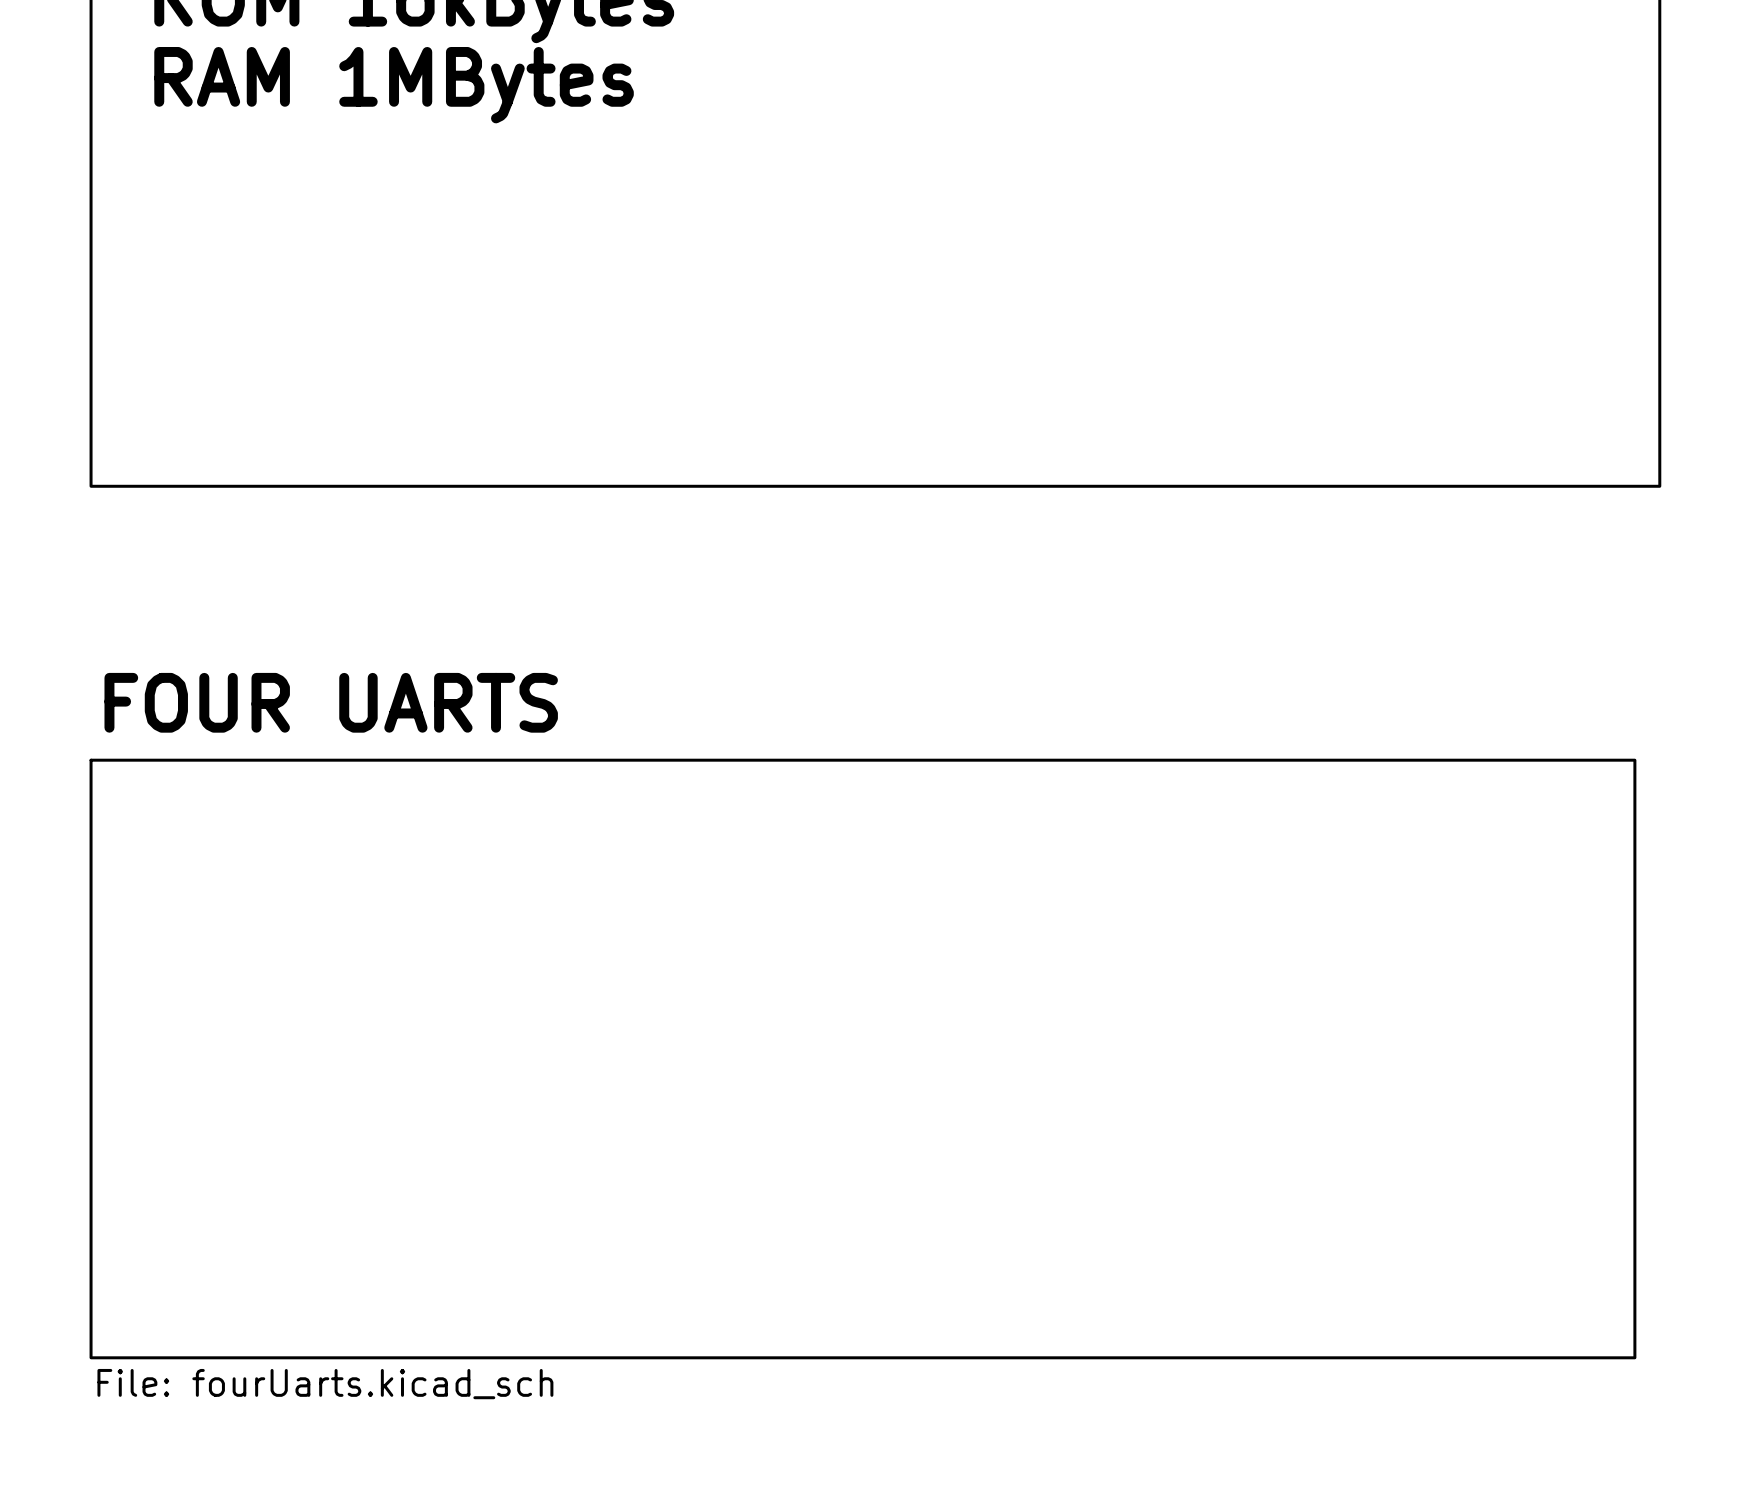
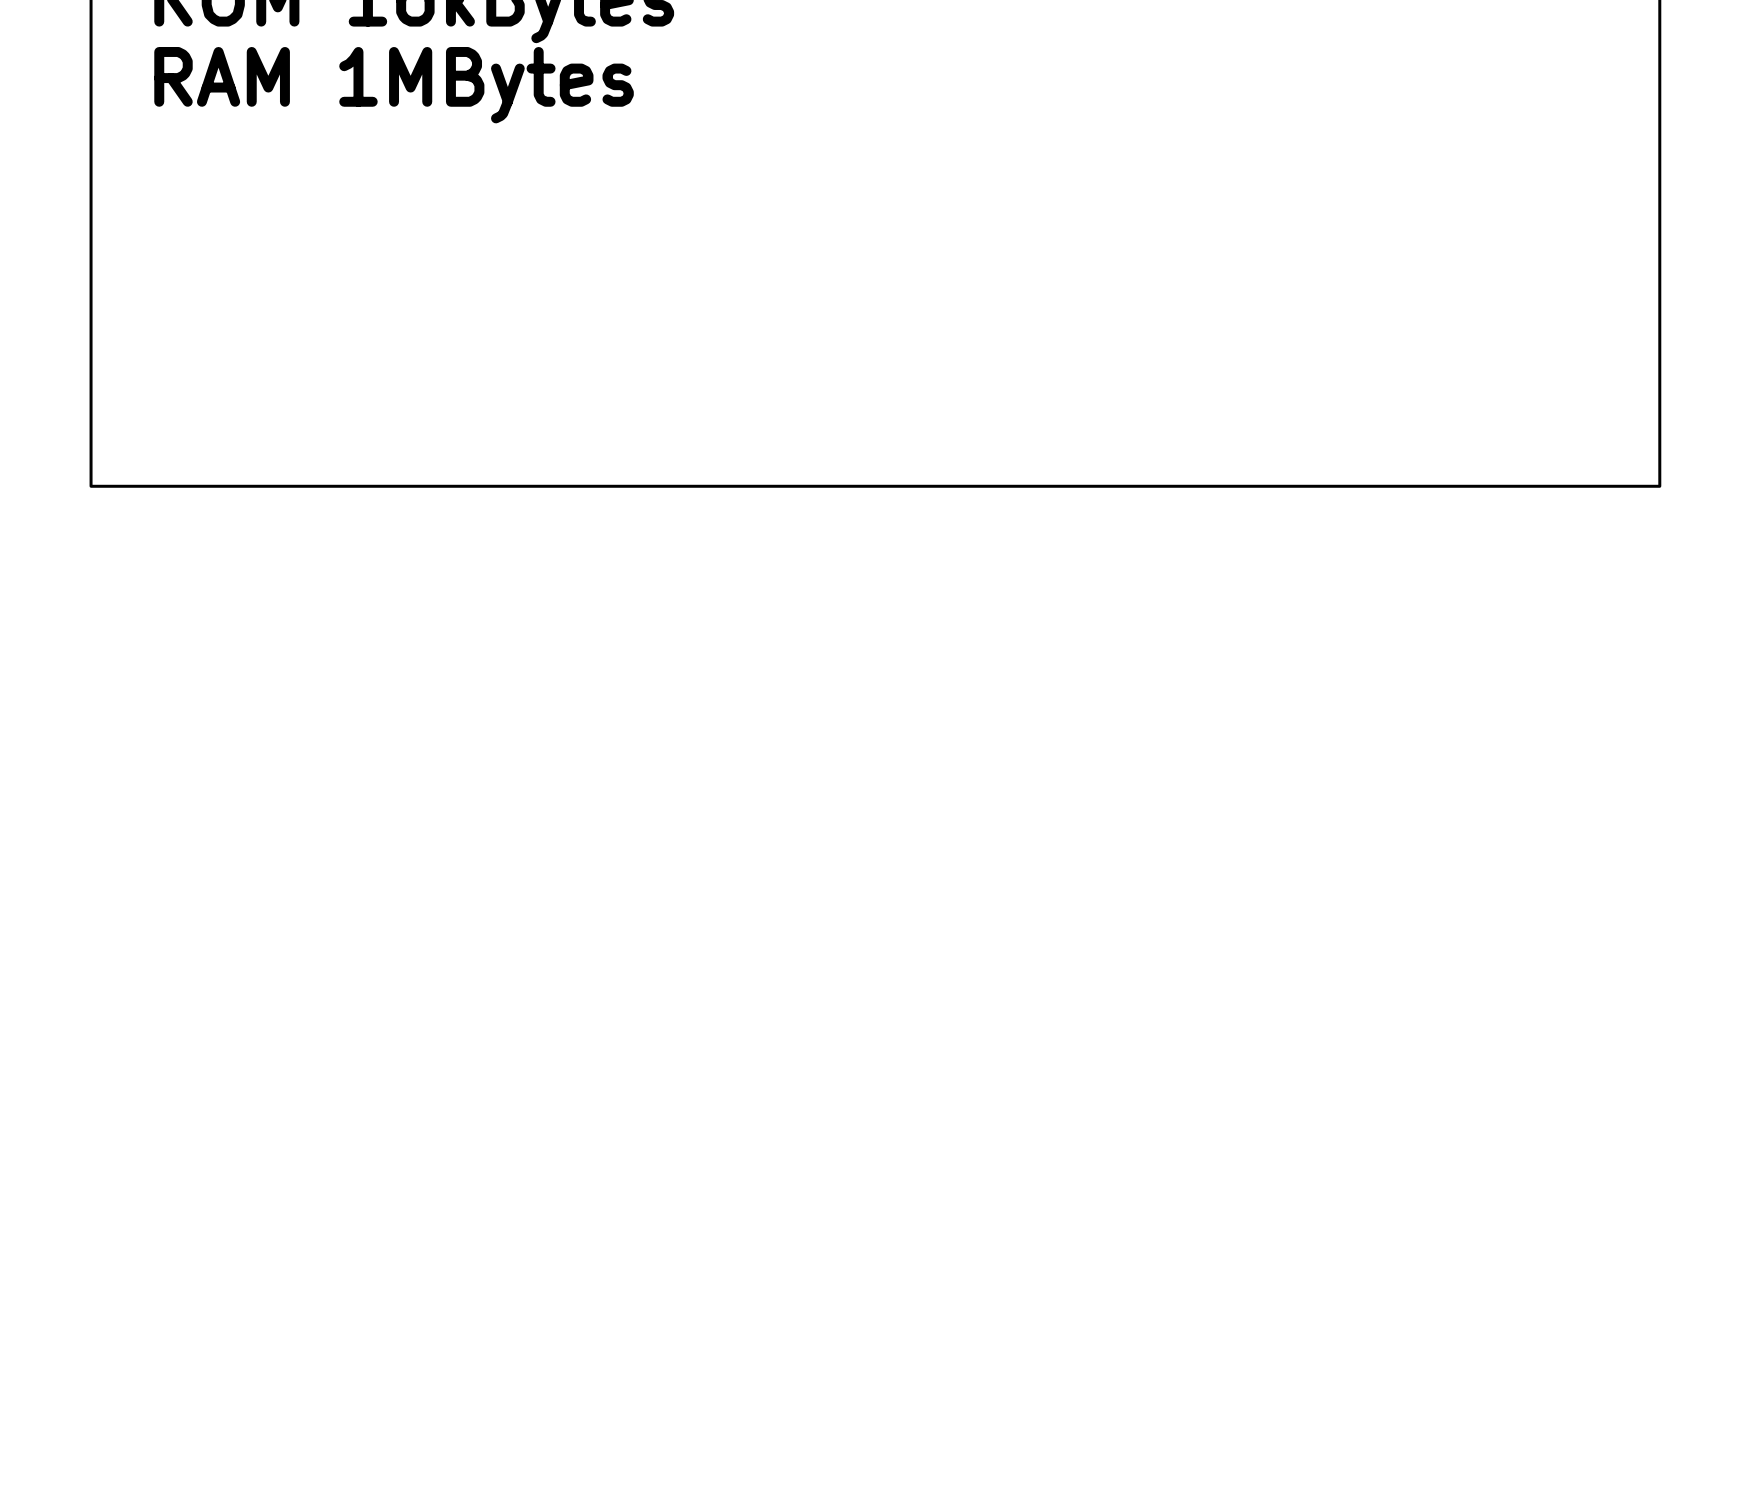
sheet FOUR UARTS: File: fourUarts.kicad_sch (862, 1058) -> none

